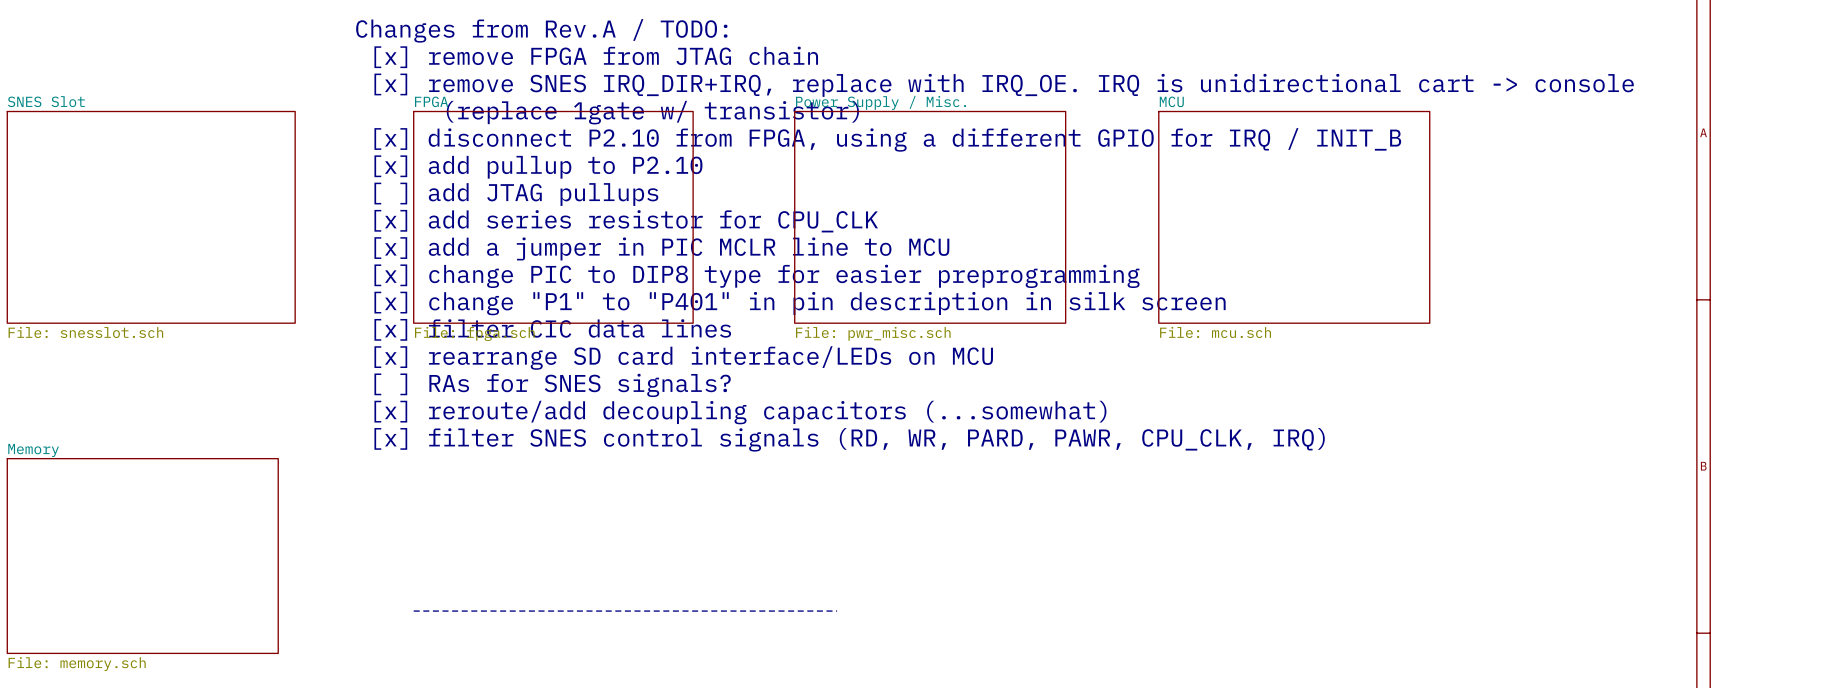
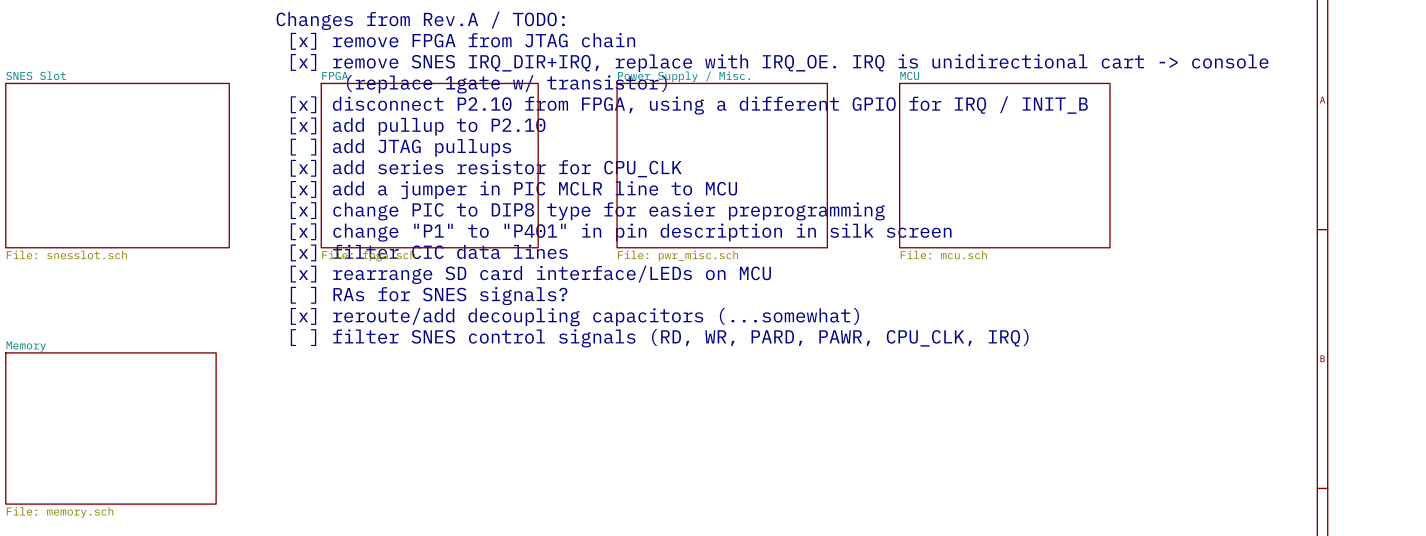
text: [x] filter SNES control signals (RD, WR, PARD, PAWR, CPU_CLK, IRQ) (849, 439) -> [ ] filter SNES control signals (RD, WR, PARD, PAWR, CPU_CLK, IRQ) (659, 338)
line: (413, 611) (837, 611) -> none

